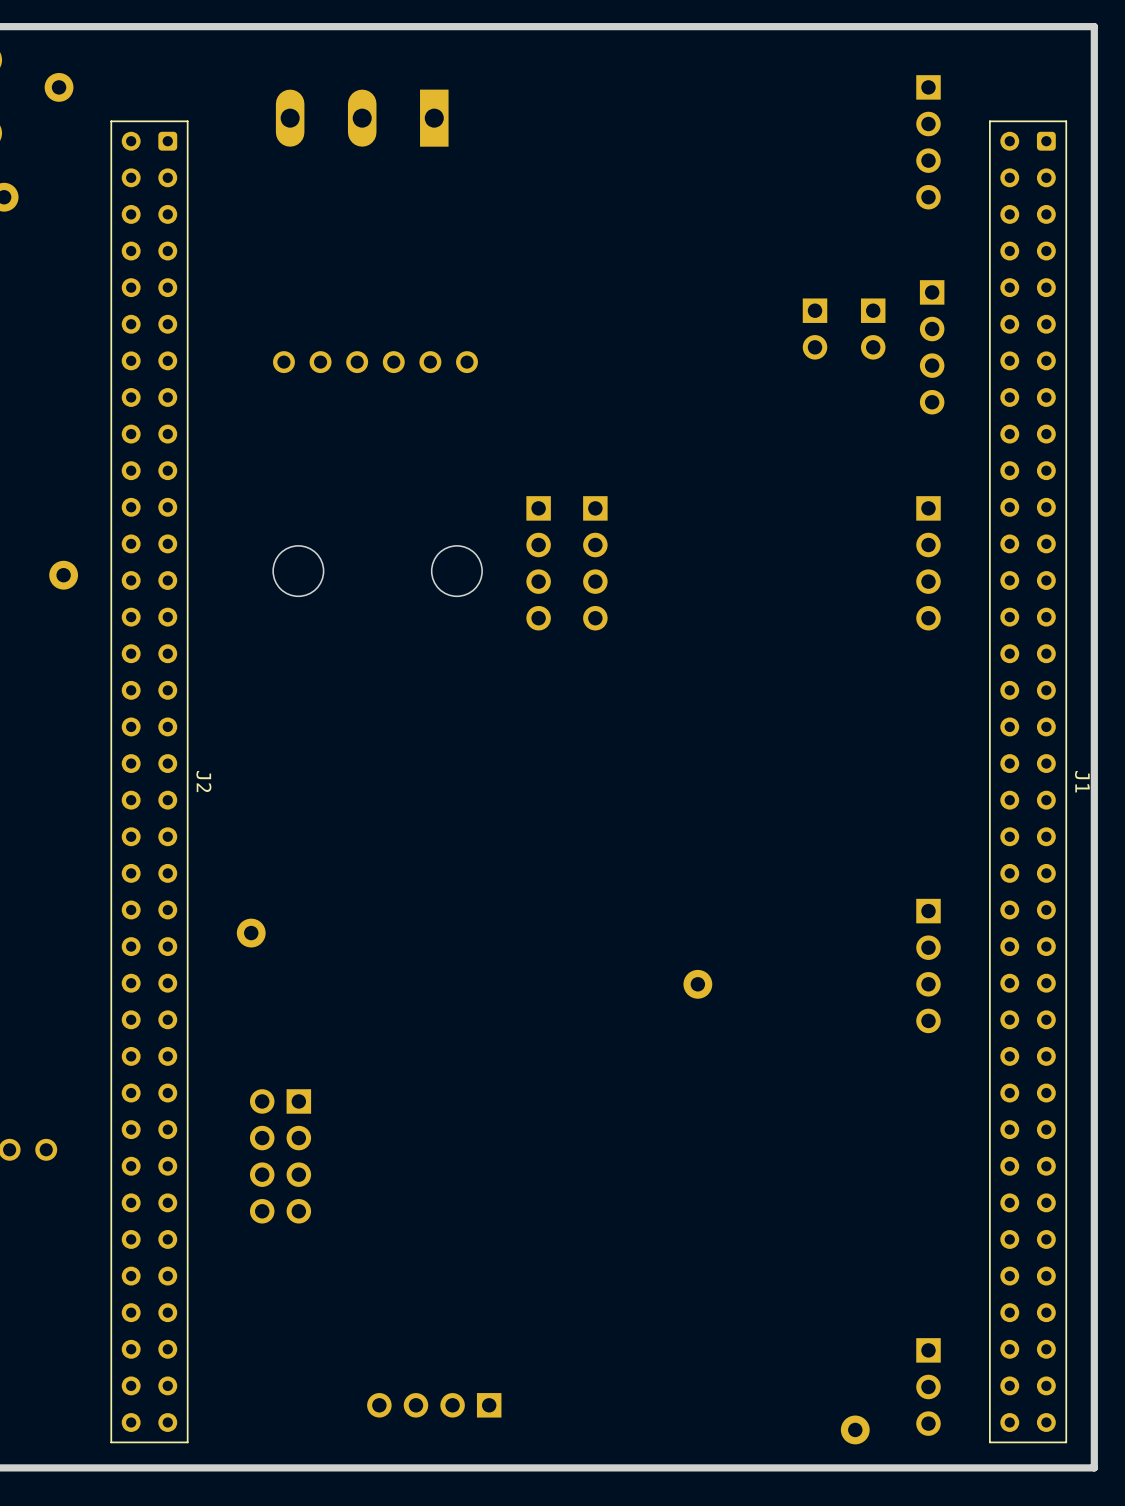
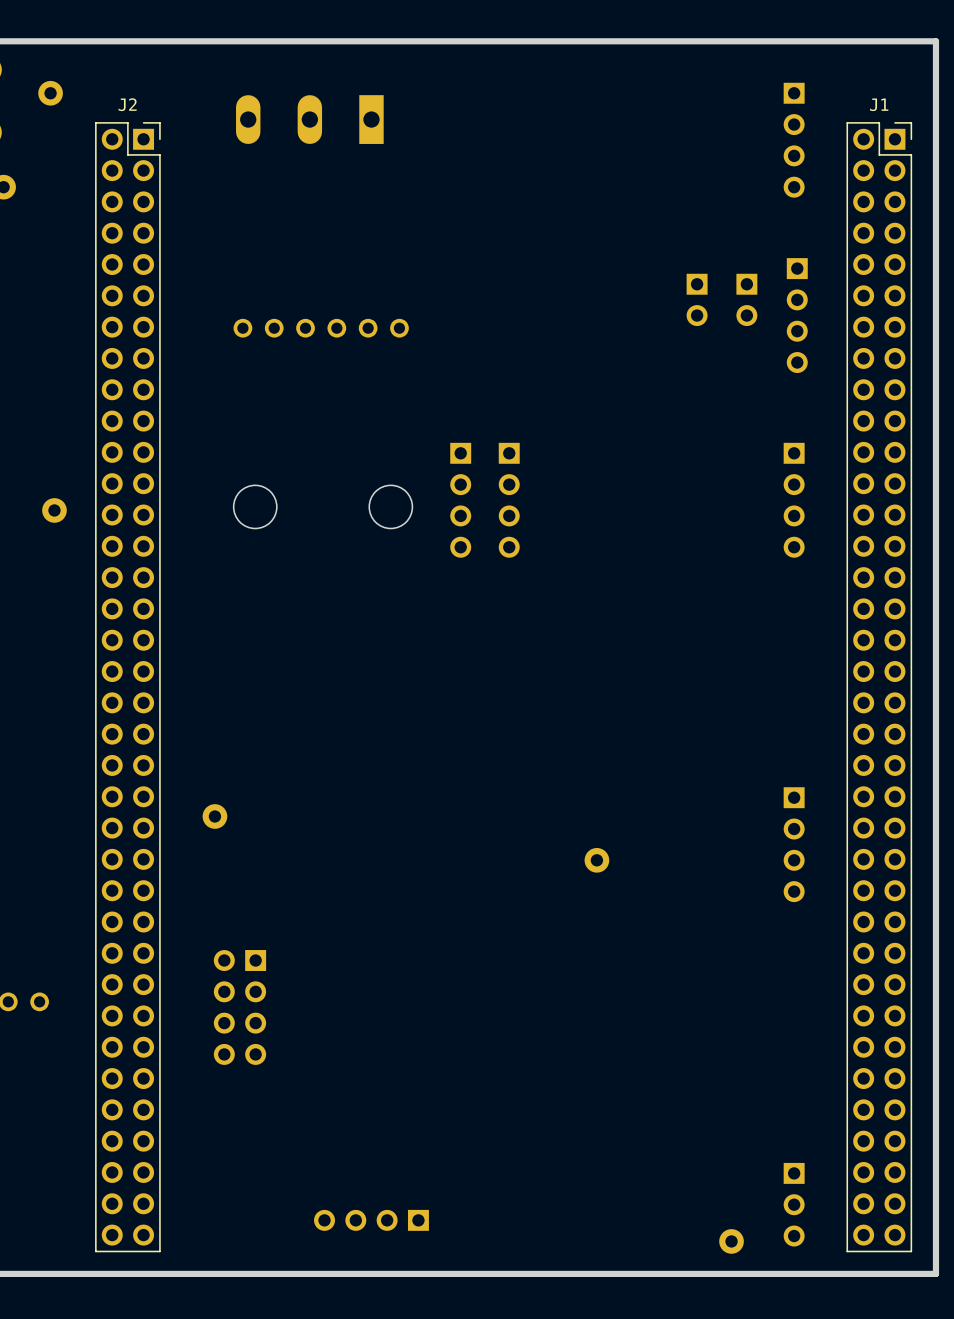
J2 footprint: [110, 120, 189, 1444] -> [95, 122, 161, 1253]
J1 footprint: [989, 120, 1068, 1444] -> [846, 122, 913, 1253]
J2 name position: J2 (203, 781) -> J2 (127, 104)
J1 name position: J1 (1082, 781) -> J1 (879, 104)

